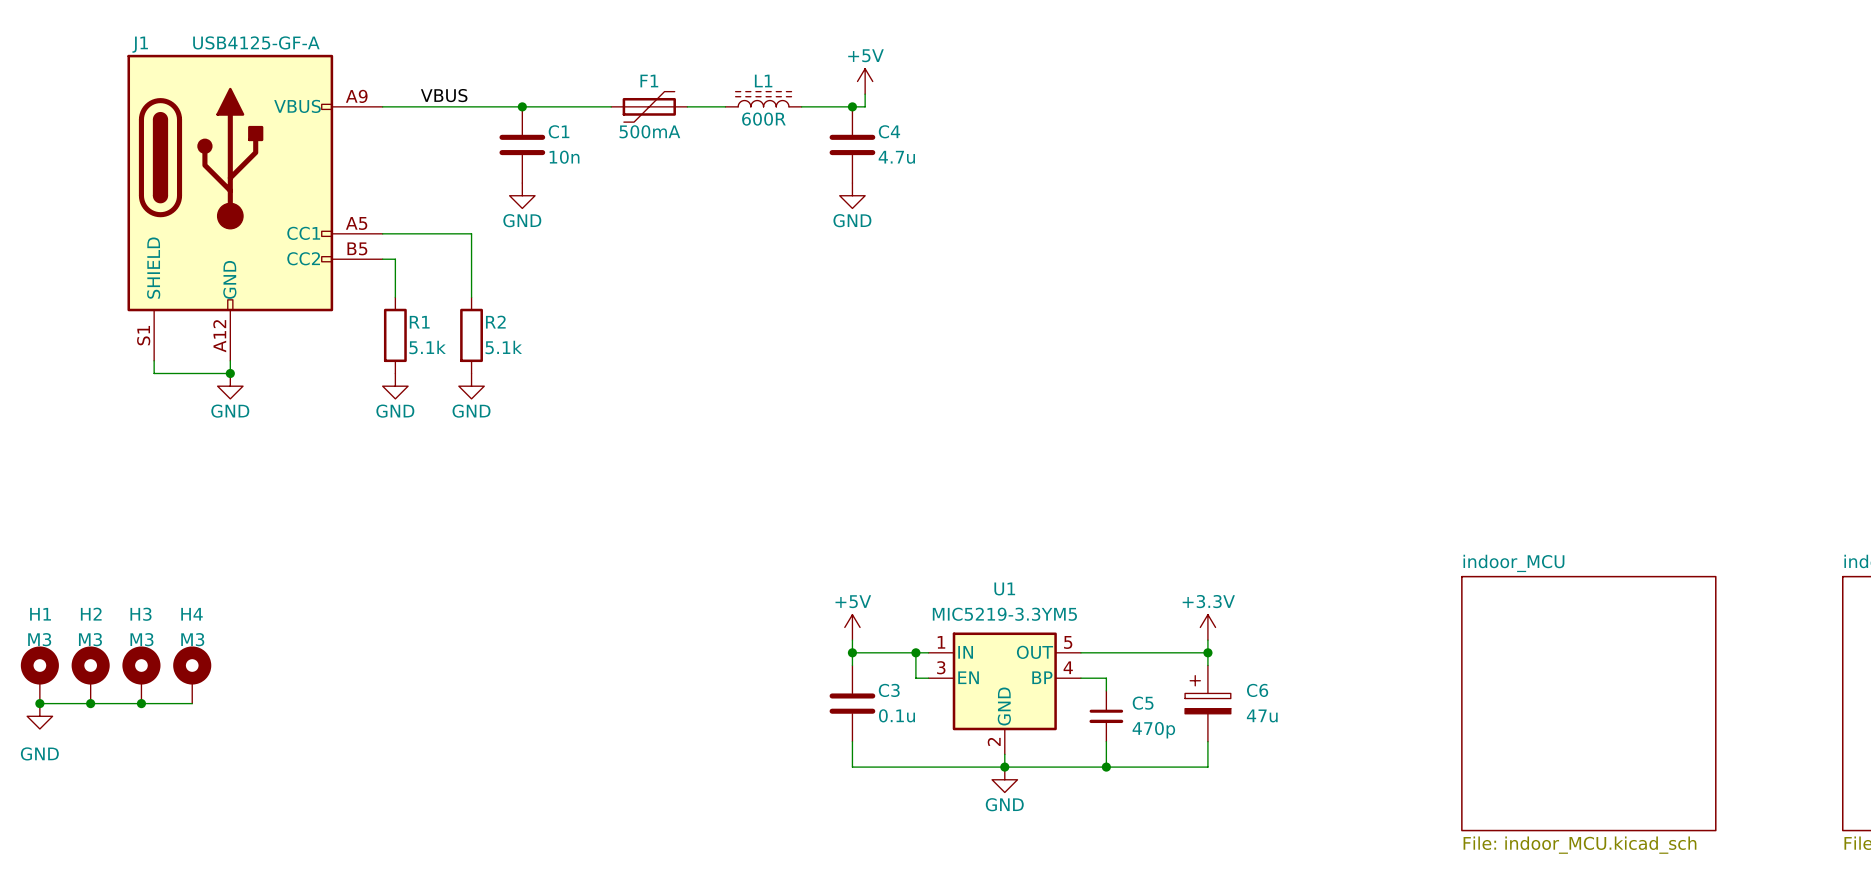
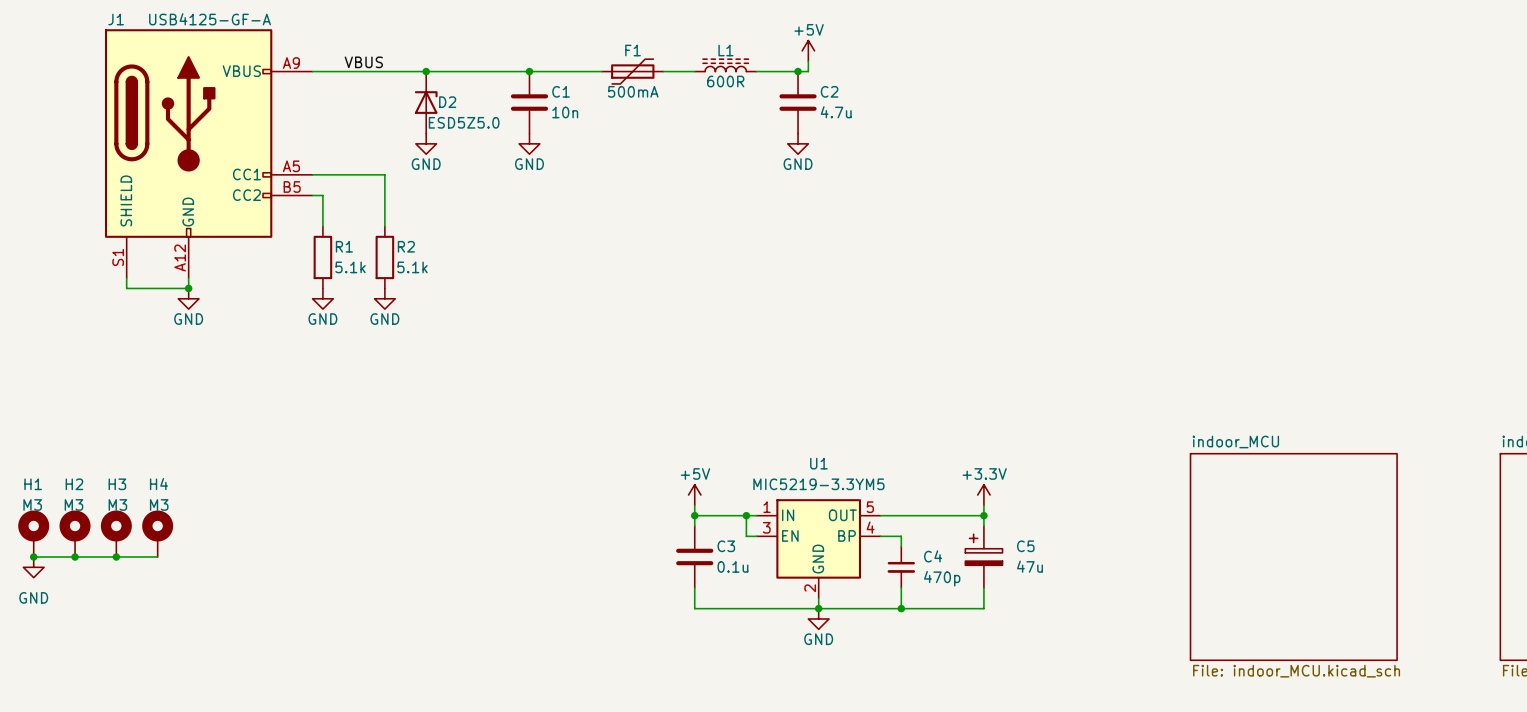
power symbol position: +5V (865, 81) -> +5V (808, 50)
wire: none -> (808, 61) (808, 71) (756, 71)
L1 position: (763, 99) -> (725, 65)
junction: none -> (529, 71)
F1 position: (649, 106) -> (632, 71)
junction: (852, 106) -> none
junction: none -> (798, 71)
C1 position: (522, 144) -> (529, 102)
D2: none -> ESD5Z5.0 (426, 102)
C4: 4.7u (852, 144) -> none
C2: none -> 4.7u (798, 102)
power symbol: none -> GND (529, 143)
power symbol: GND (852, 195) -> none
power symbol: none -> GND (798, 143)
C6 name: C6 (1257, 690) -> C5 (1025, 546)
C5 name: C5 (1143, 703) -> C4 (933, 556)

